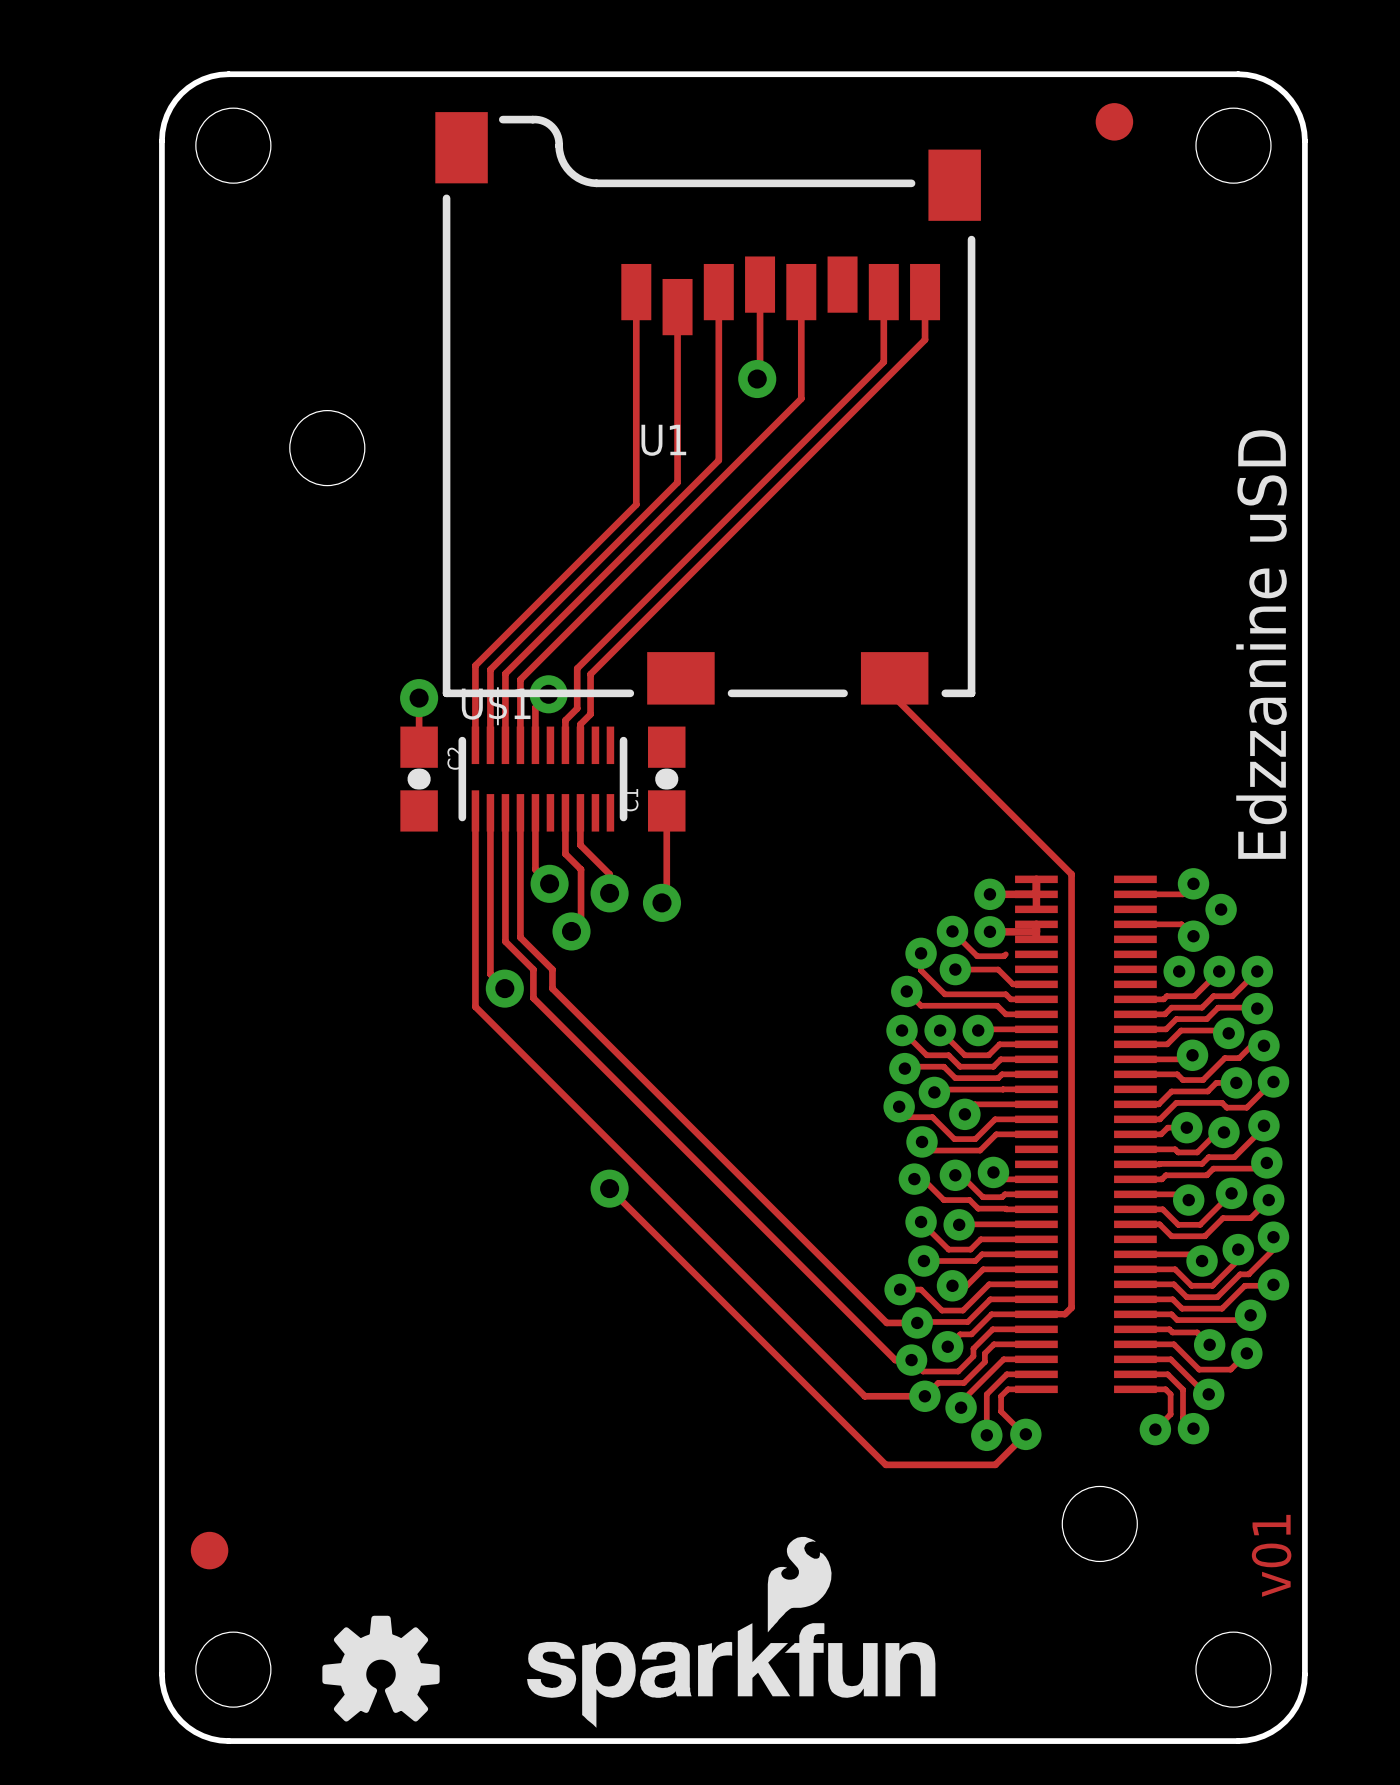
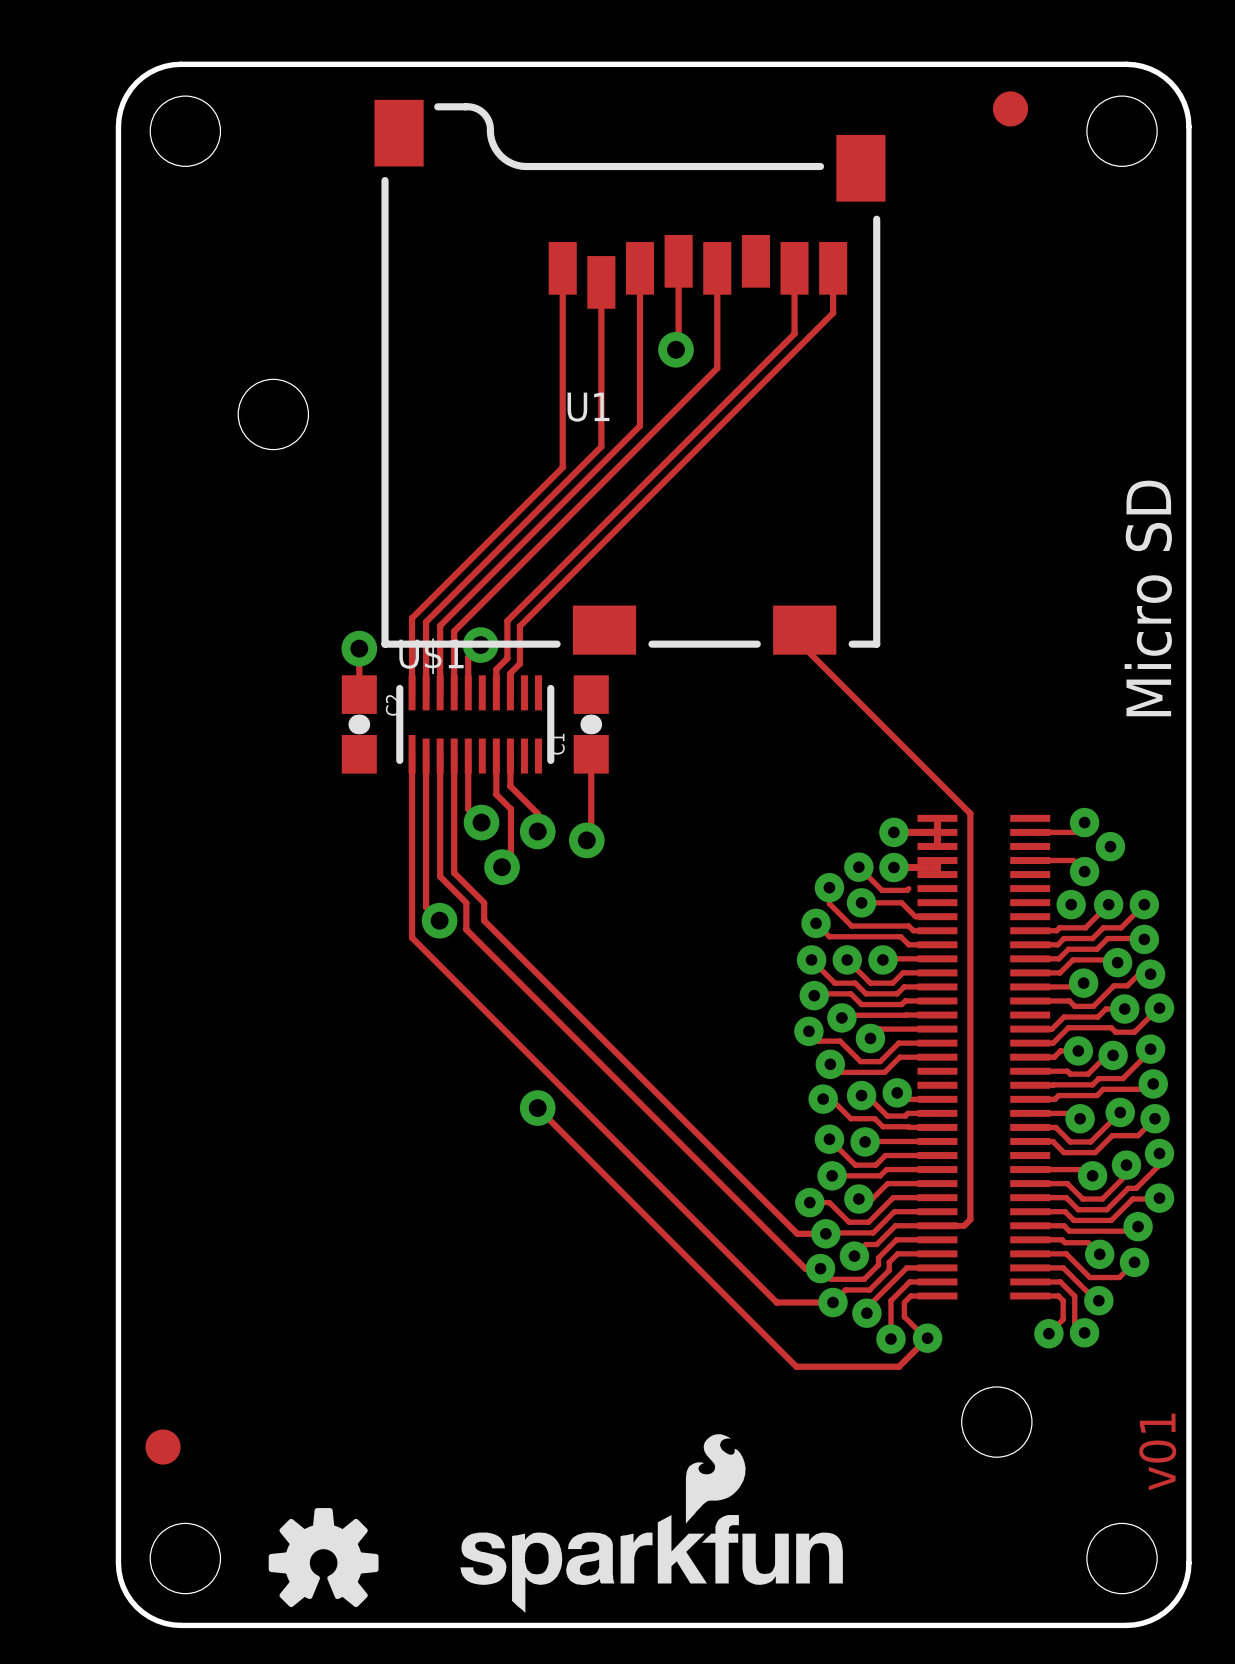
text: Edzzanine uSD (1261, 644) -> Micro SD (1148, 598)

